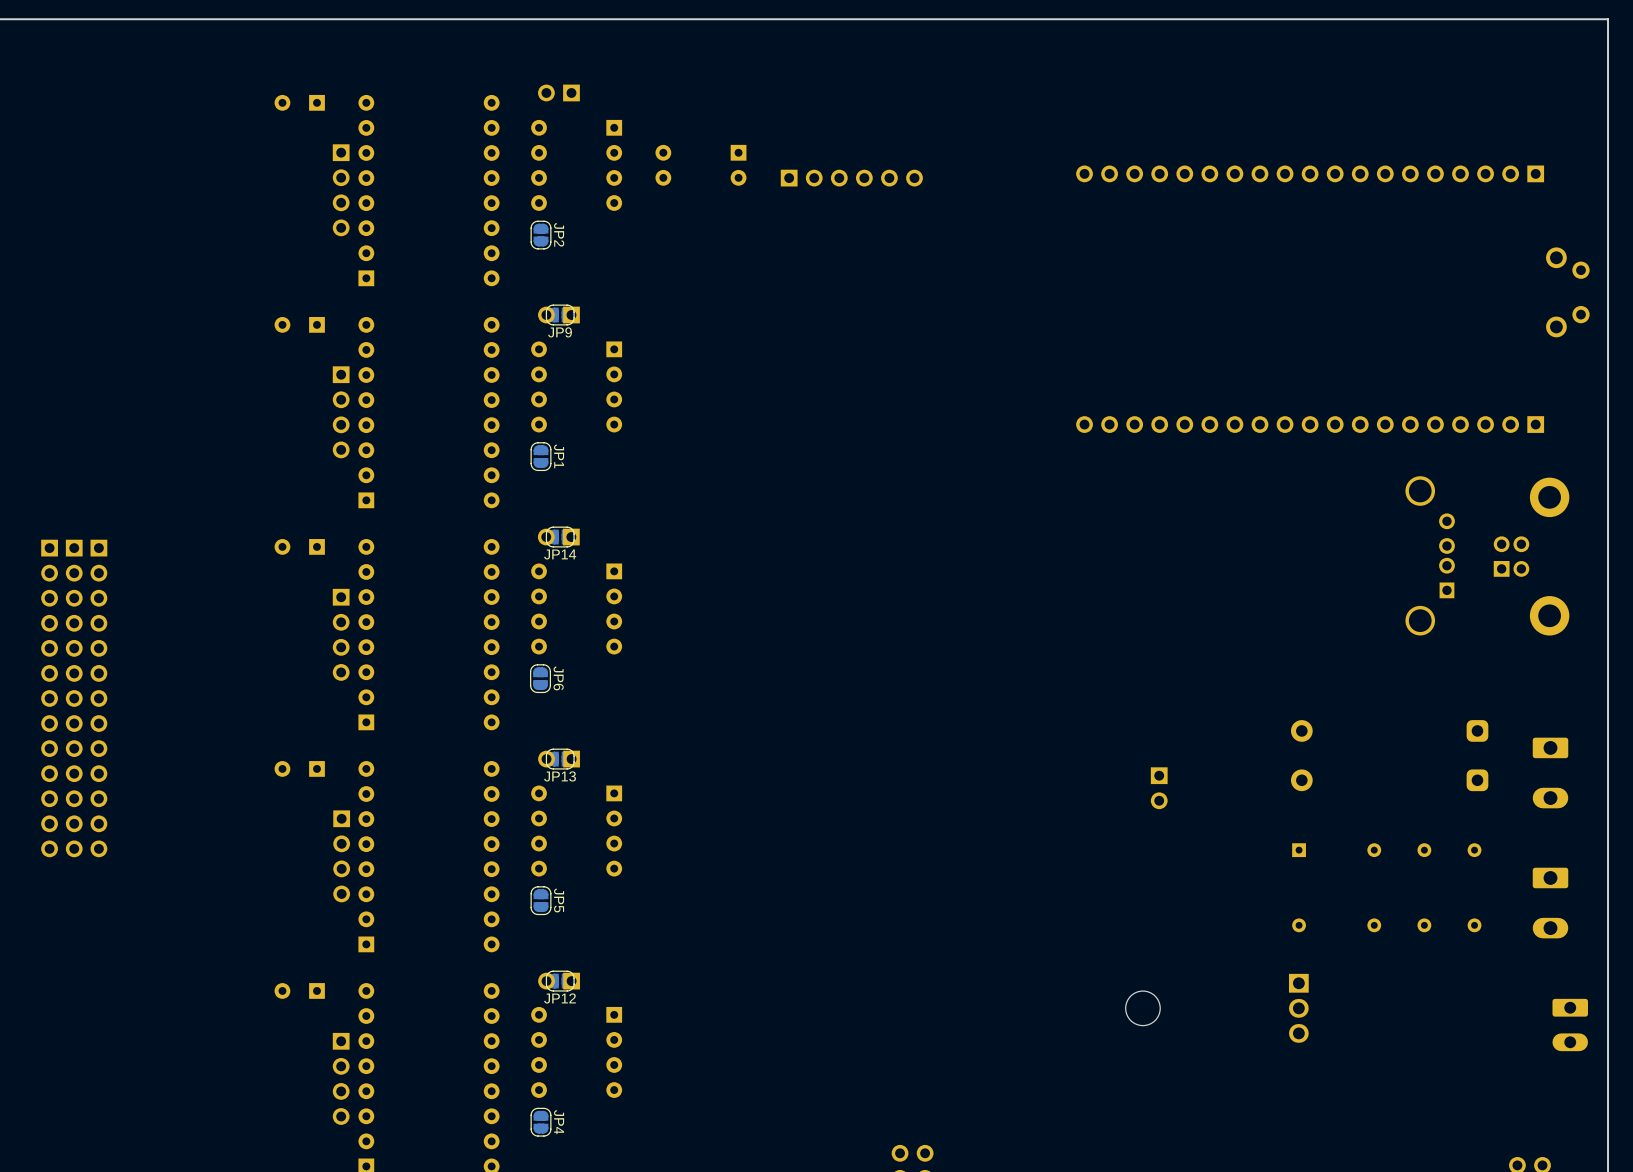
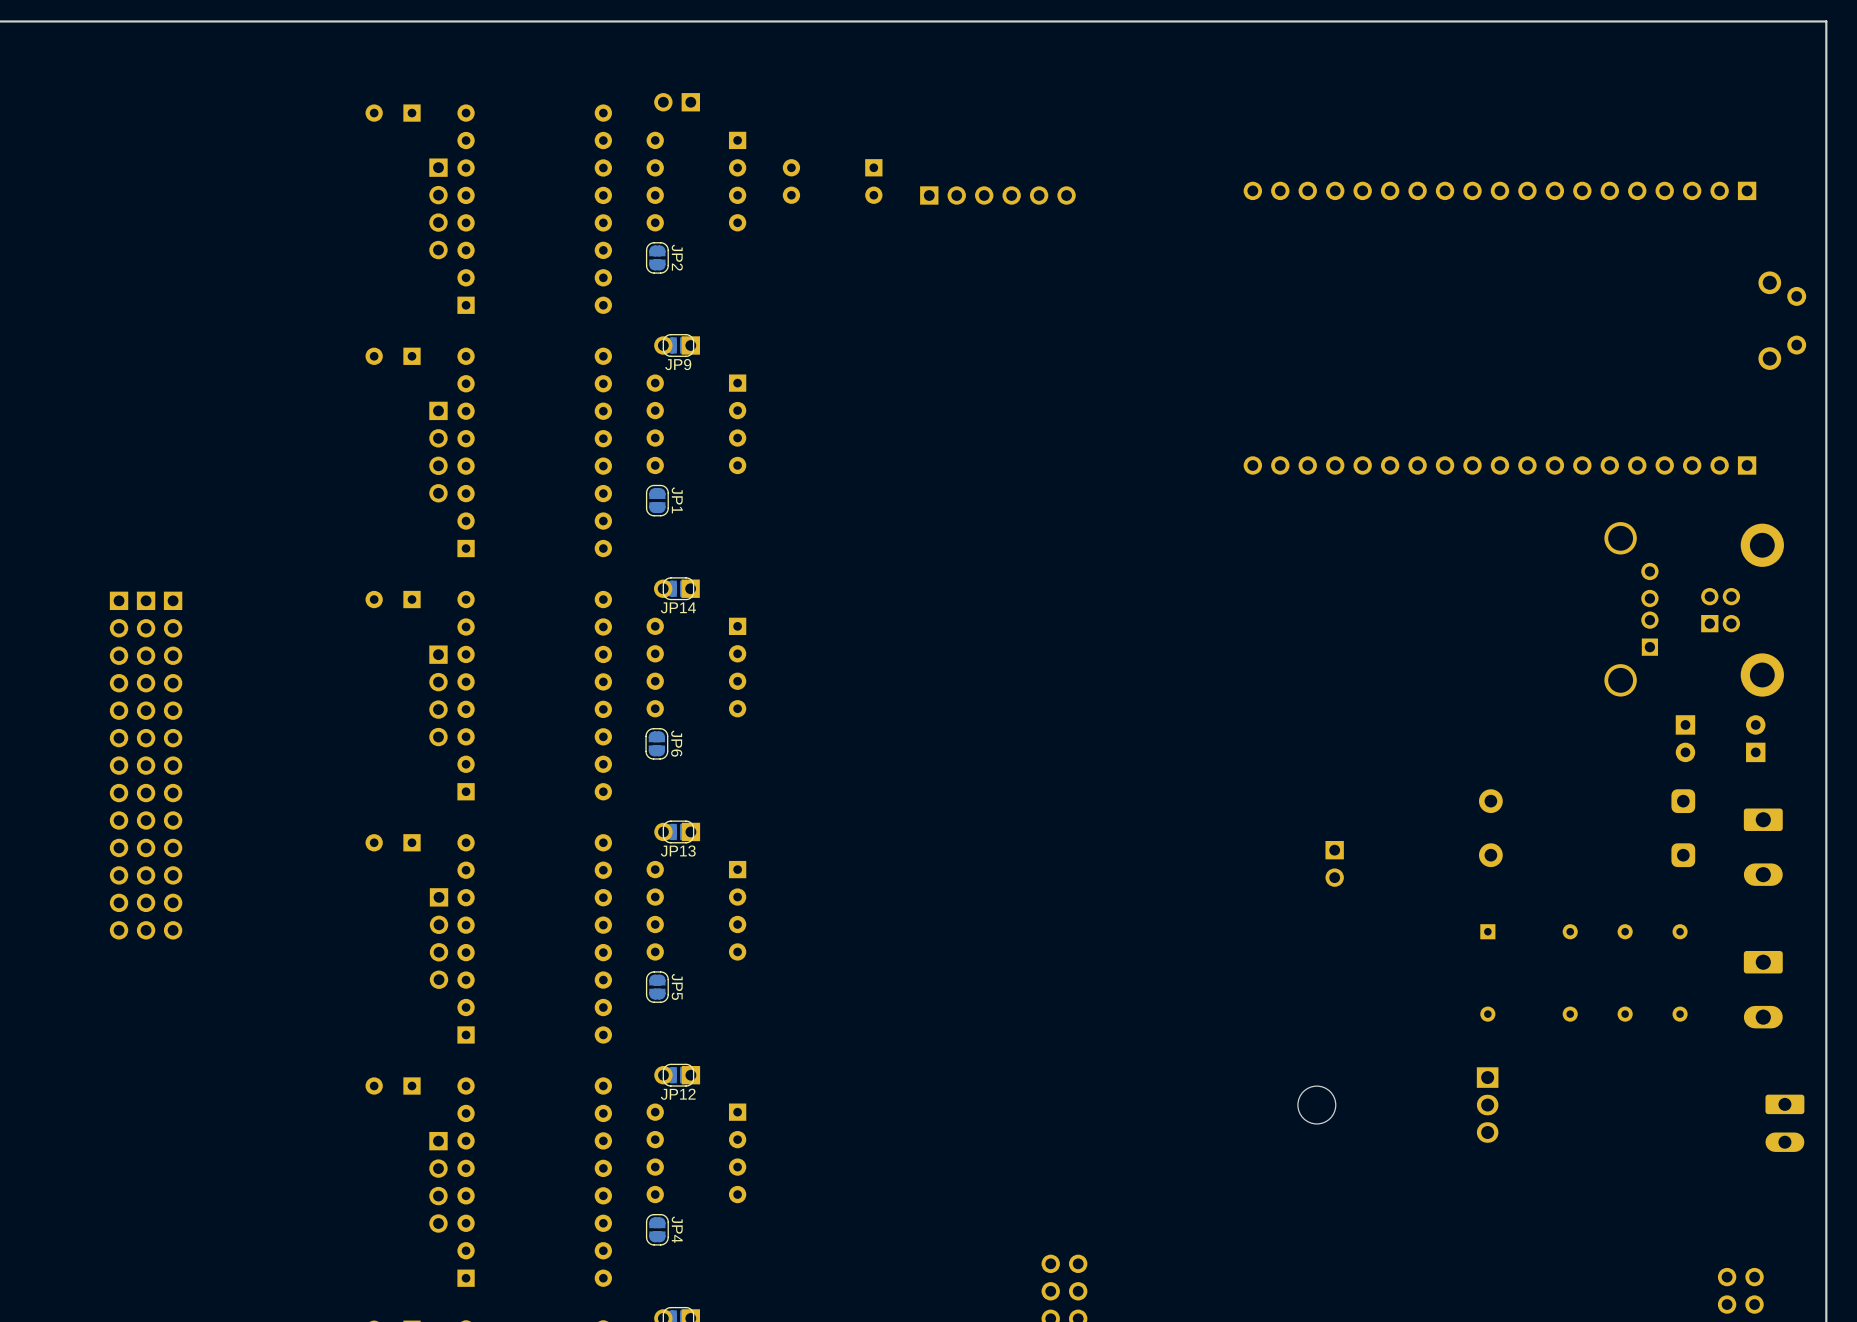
part: none -> (1685, 738)
part: none -> (1755, 738)

